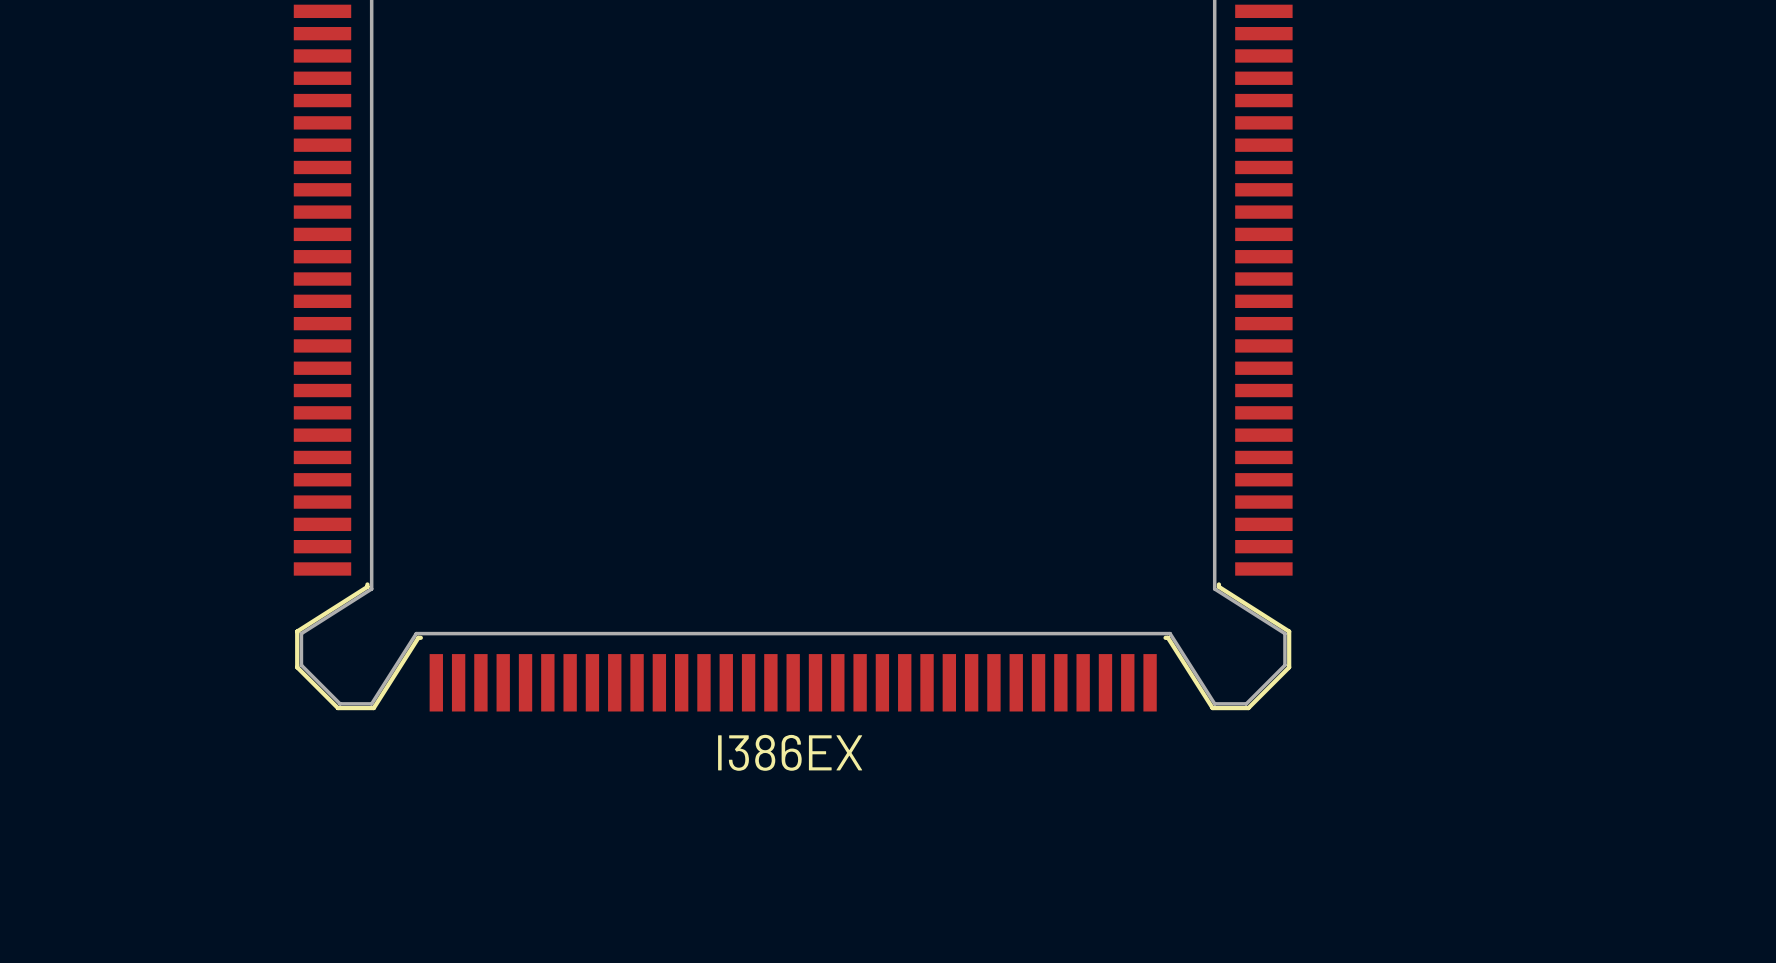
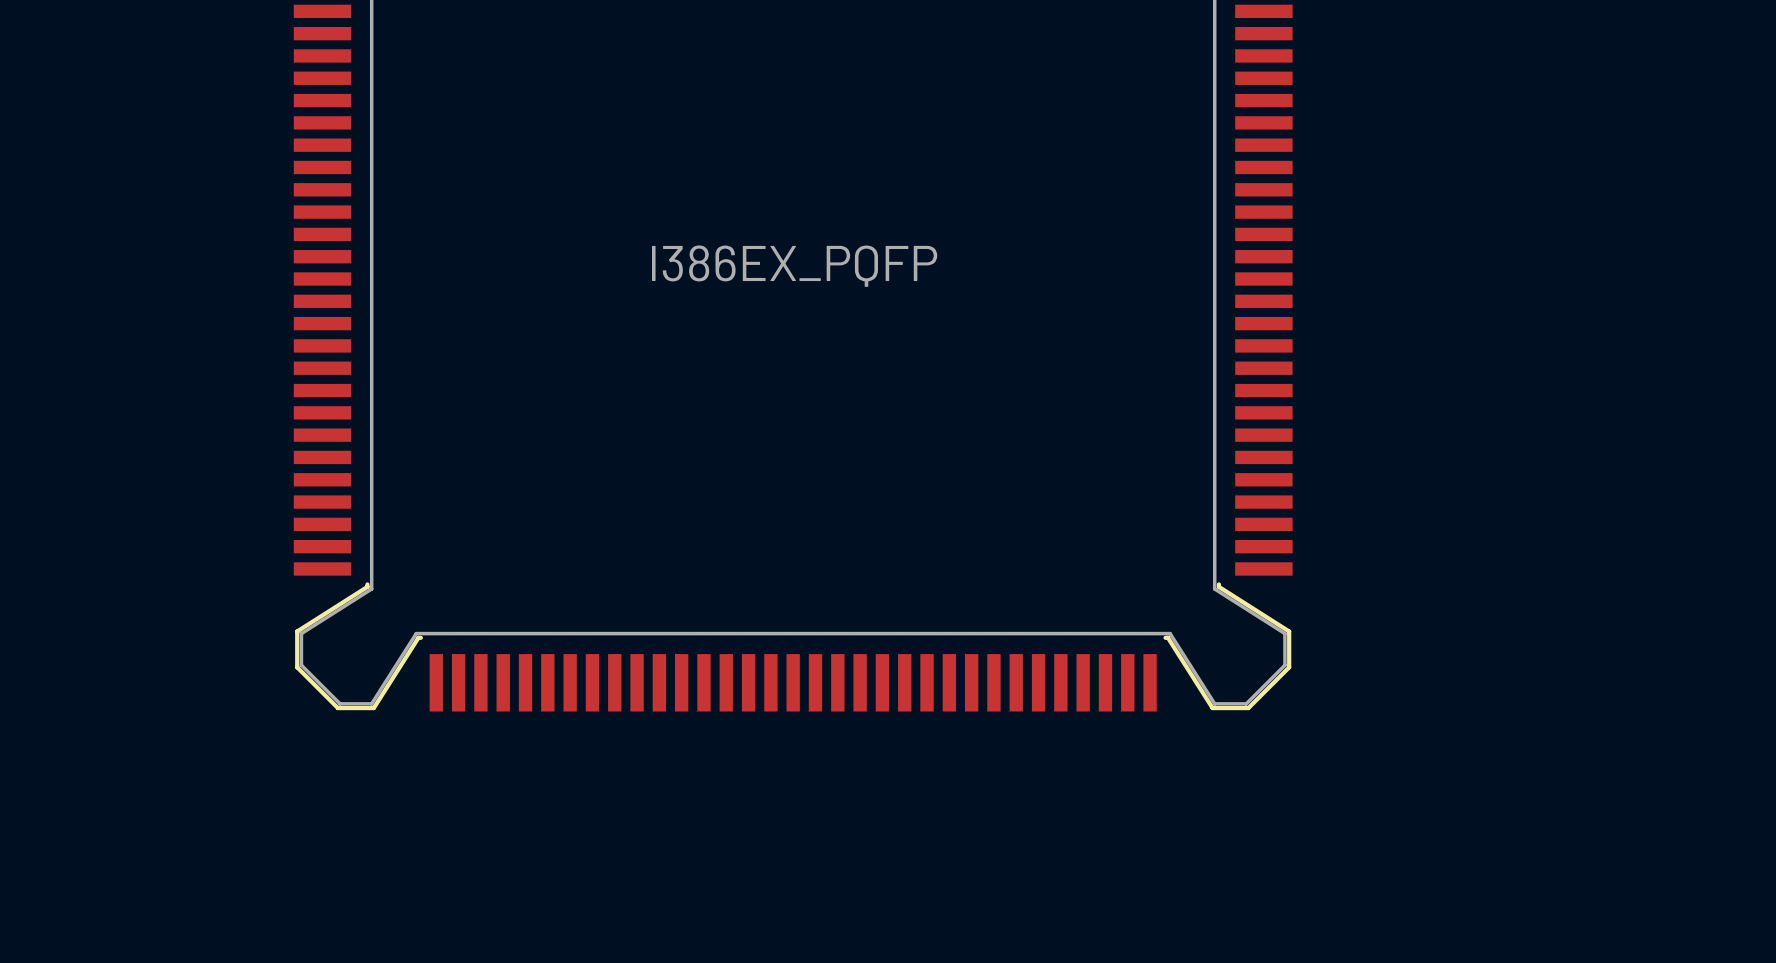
part value: I386EX (790, 752) -> I386EX_PQFP (794, 266)

